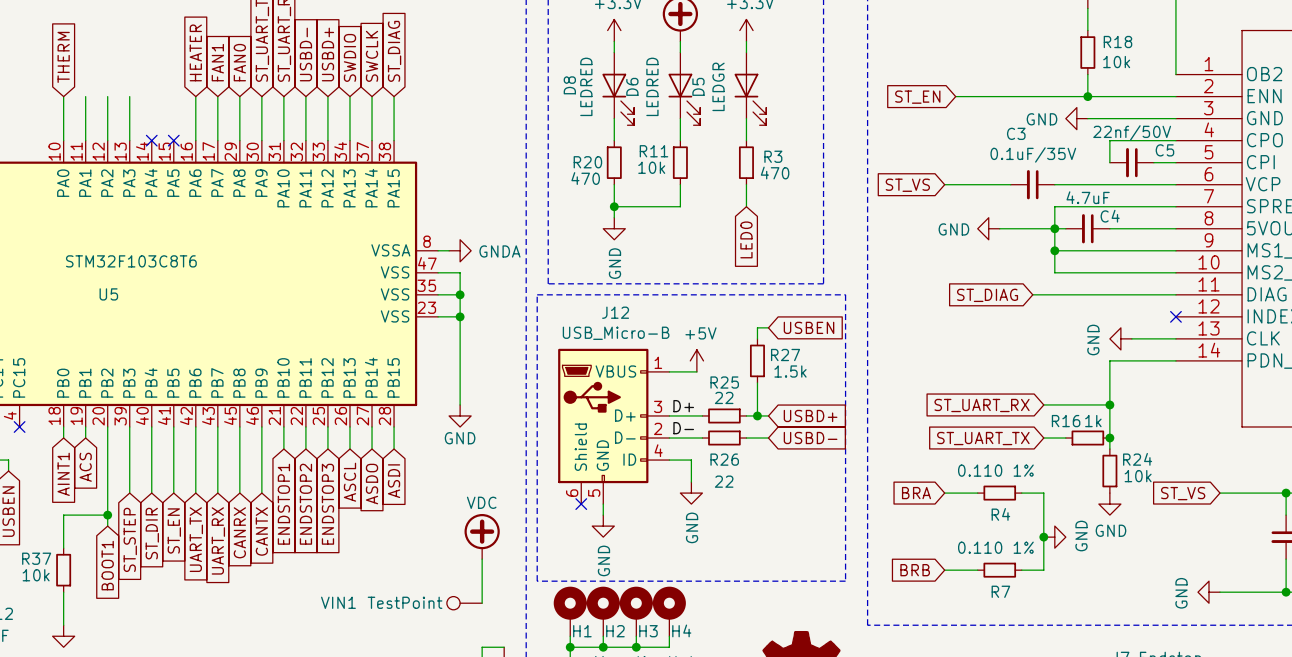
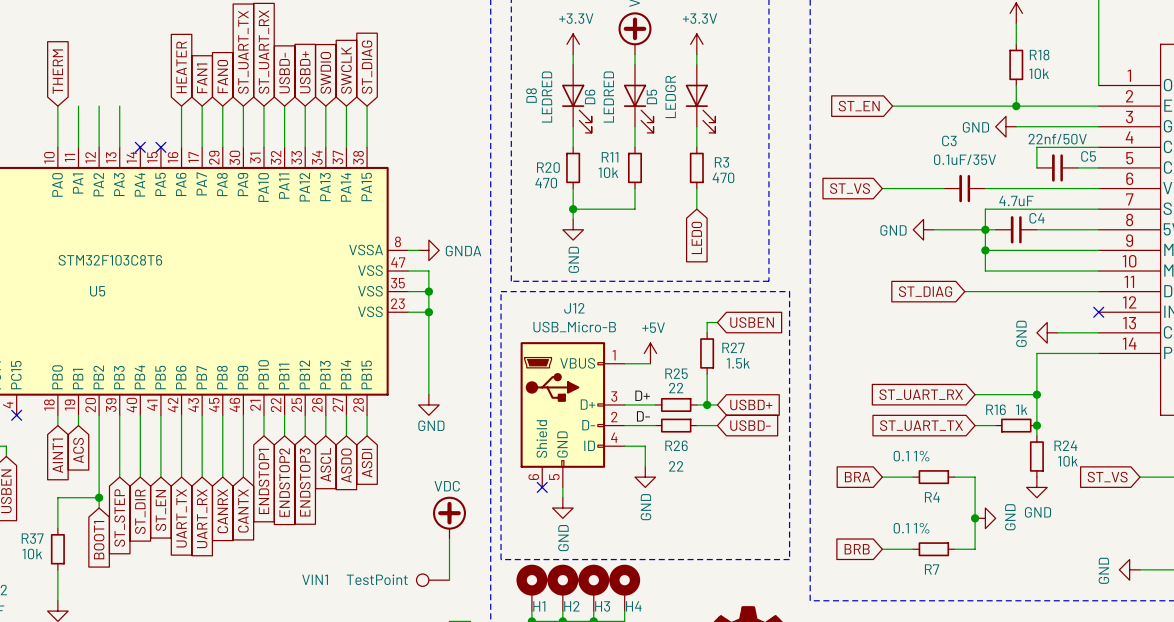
R4 value: 0.110 1% (995, 470) -> 0.1 1% (911, 456)
R7 value: 0.110 1% (995, 547) -> 0.1 1% (911, 528)

